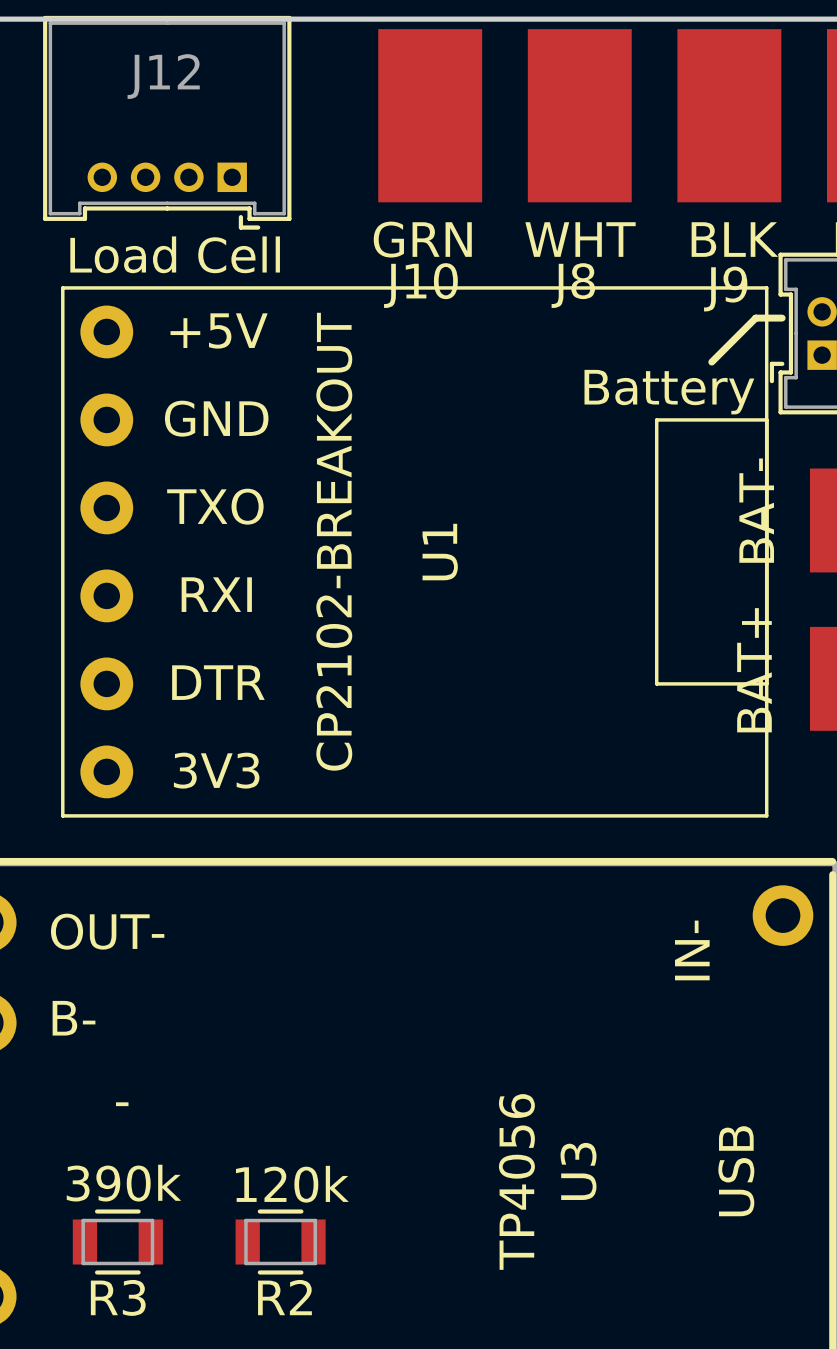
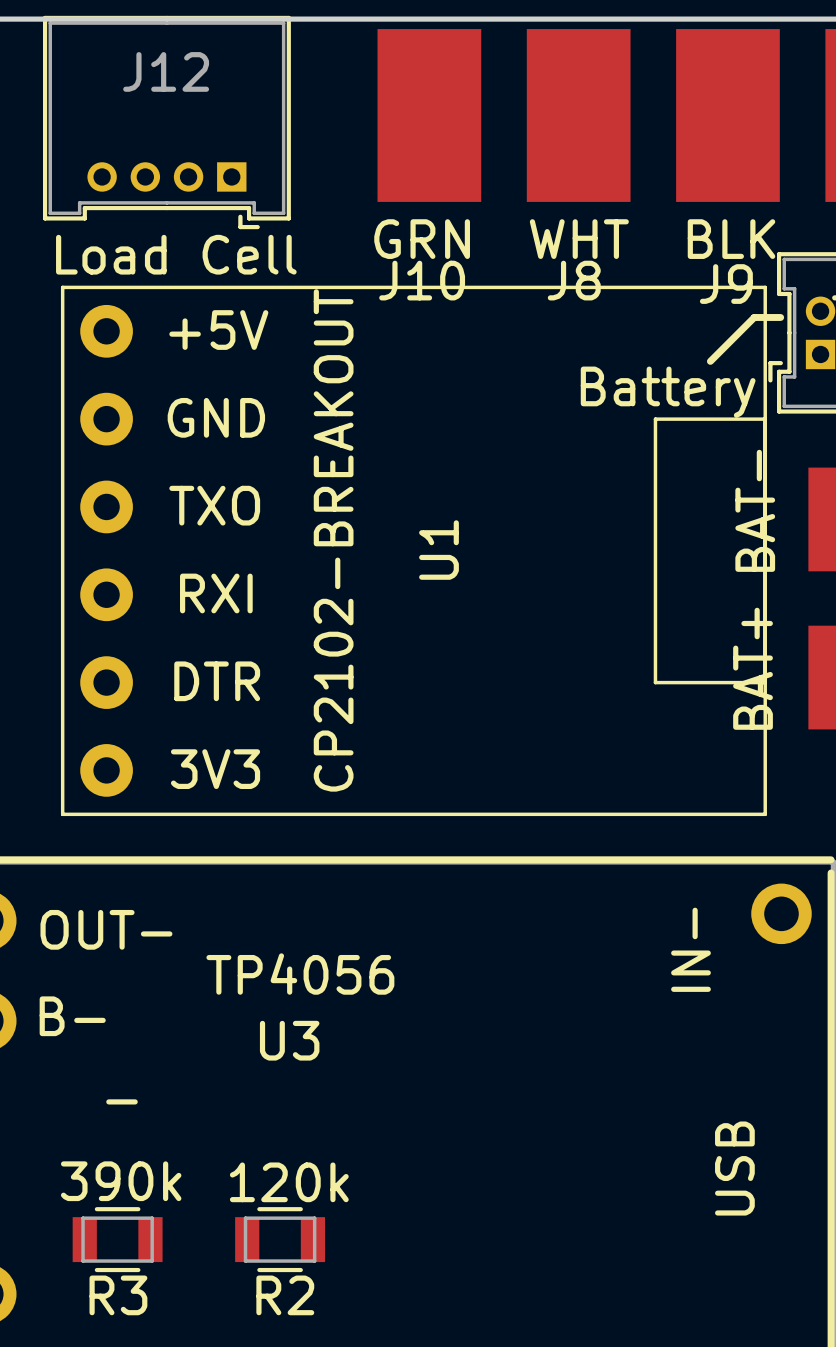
U3 name rotation: 0° (578, 1171) -> 90° clockwise (289, 1040)
U3 name position: U3 (578, 1171) -> U3 (289, 1040)
U3 value rotation: 0° (516, 1181) -> 90° clockwise (300, 974)
U3 value position: TP4056 (516, 1181) -> TP4056 (300, 974)

